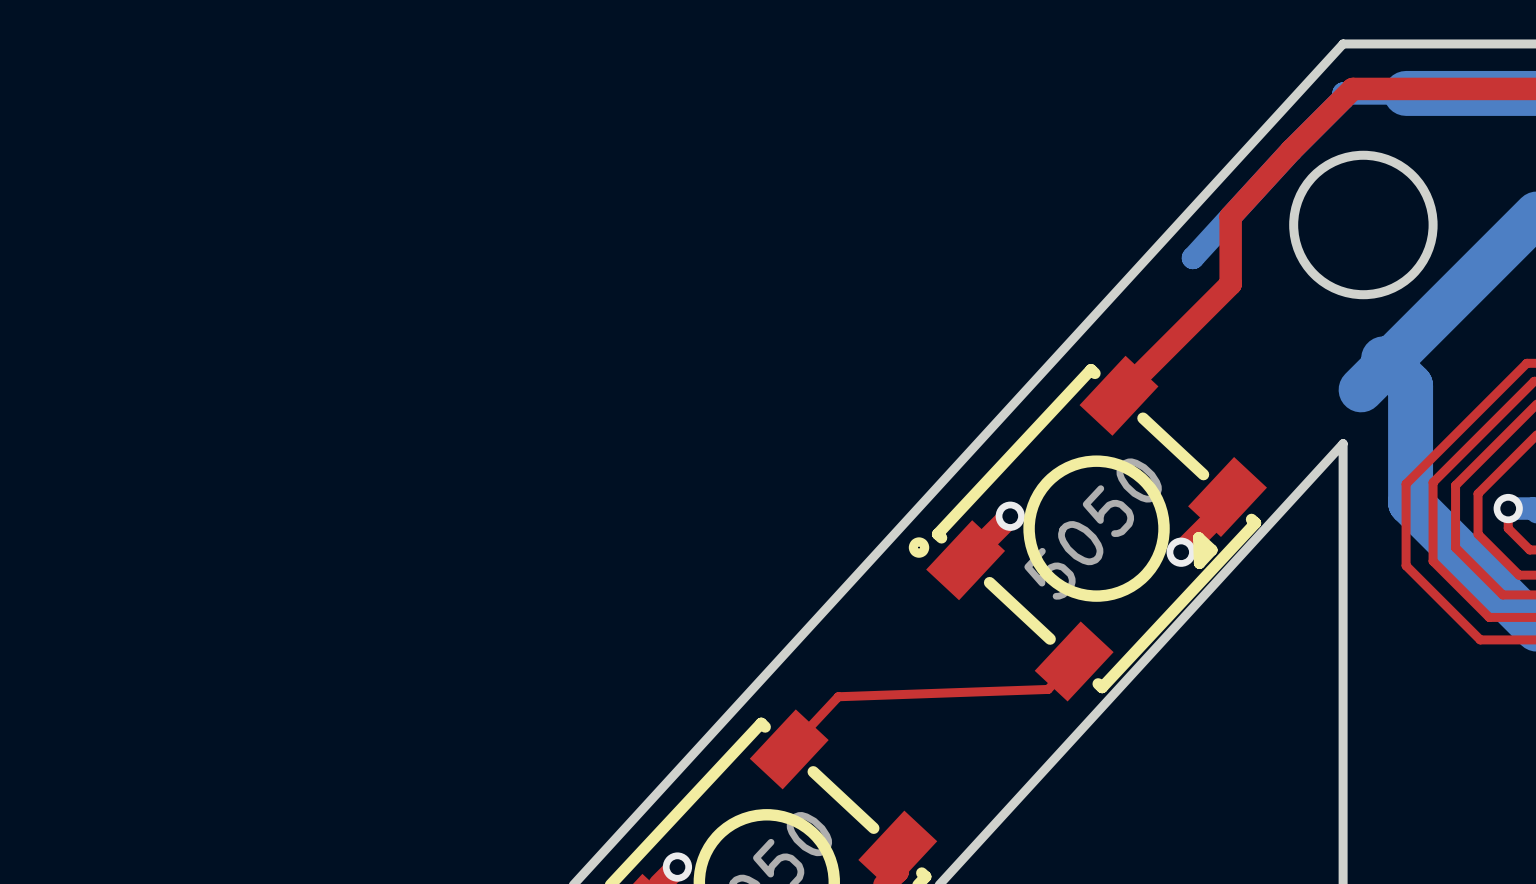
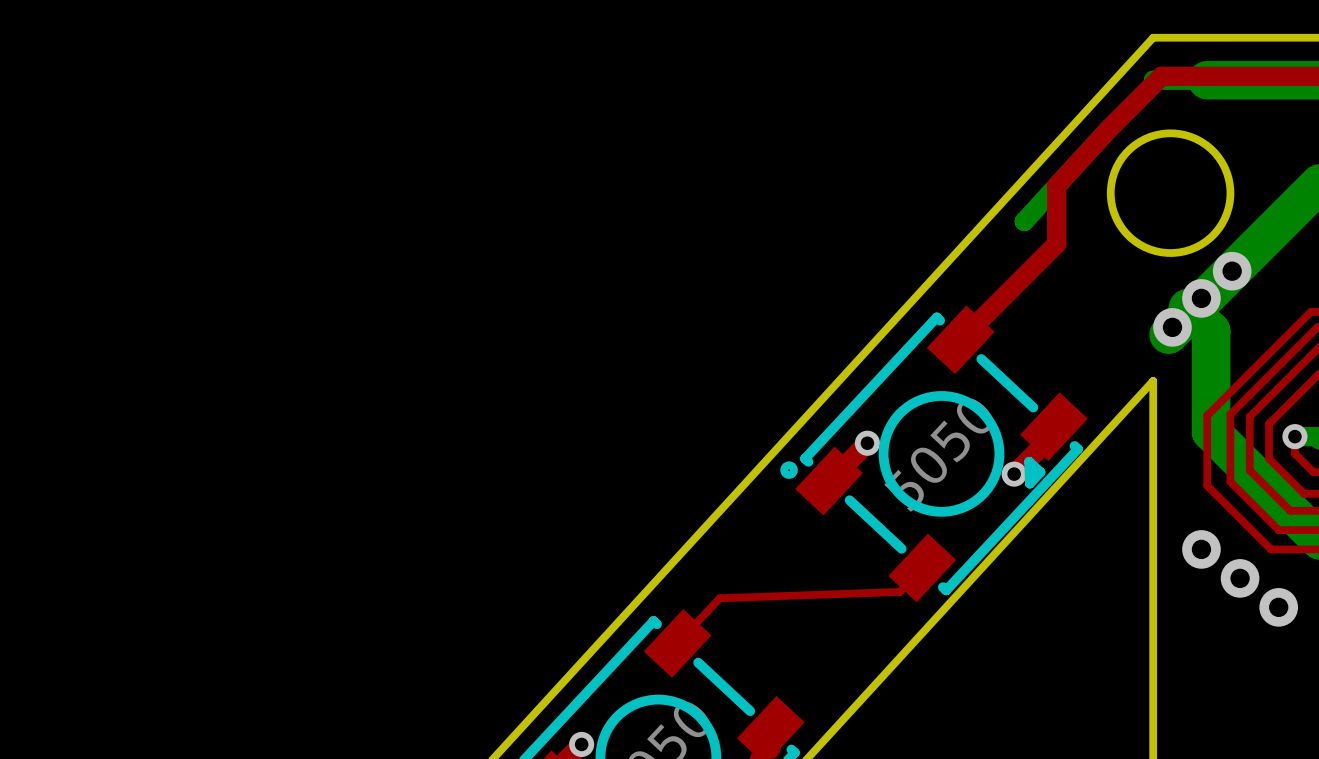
via: none -> (1232, 271)
via: none -> (1201, 298)
via: none -> (1172, 327)
via: none -> (1201, 549)
via: none -> (1240, 578)
via: none -> (1278, 607)

